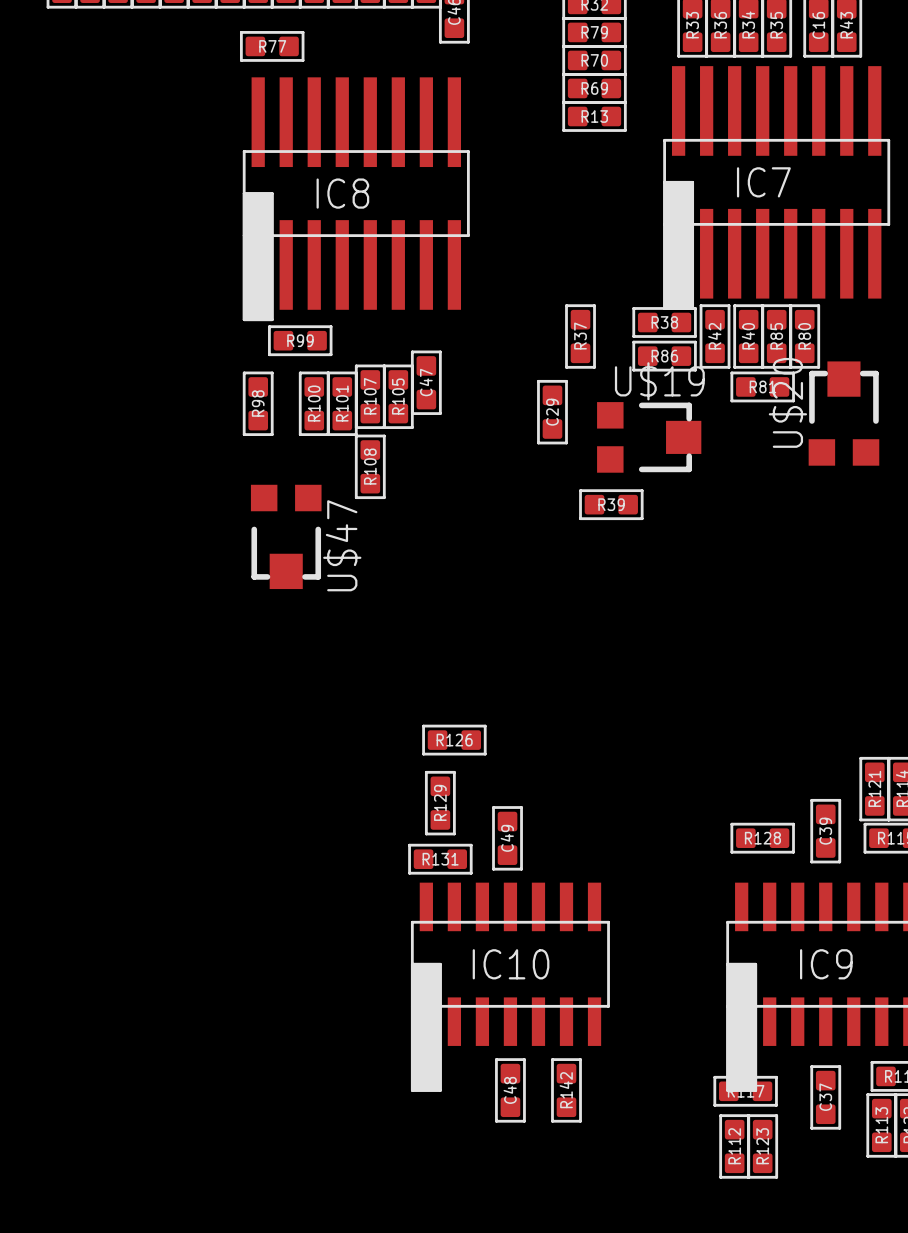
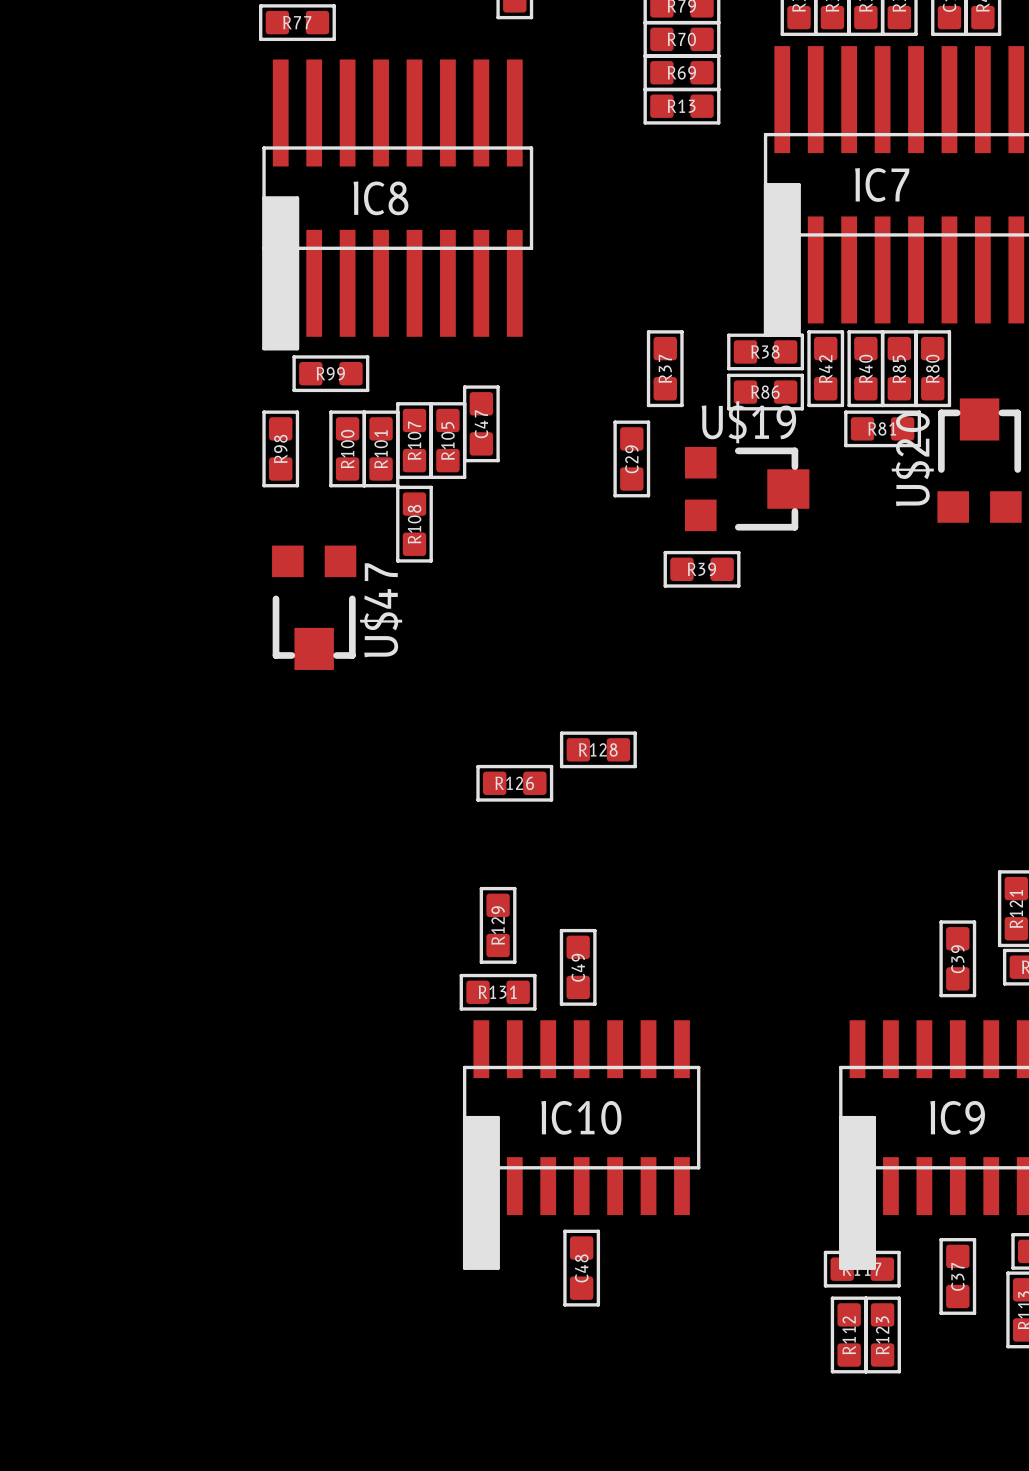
R126 position: (454, 740) -> (514, 783)
R128 position: (762, 838) -> (598, 749)
R142: (566, 1090) -> none

